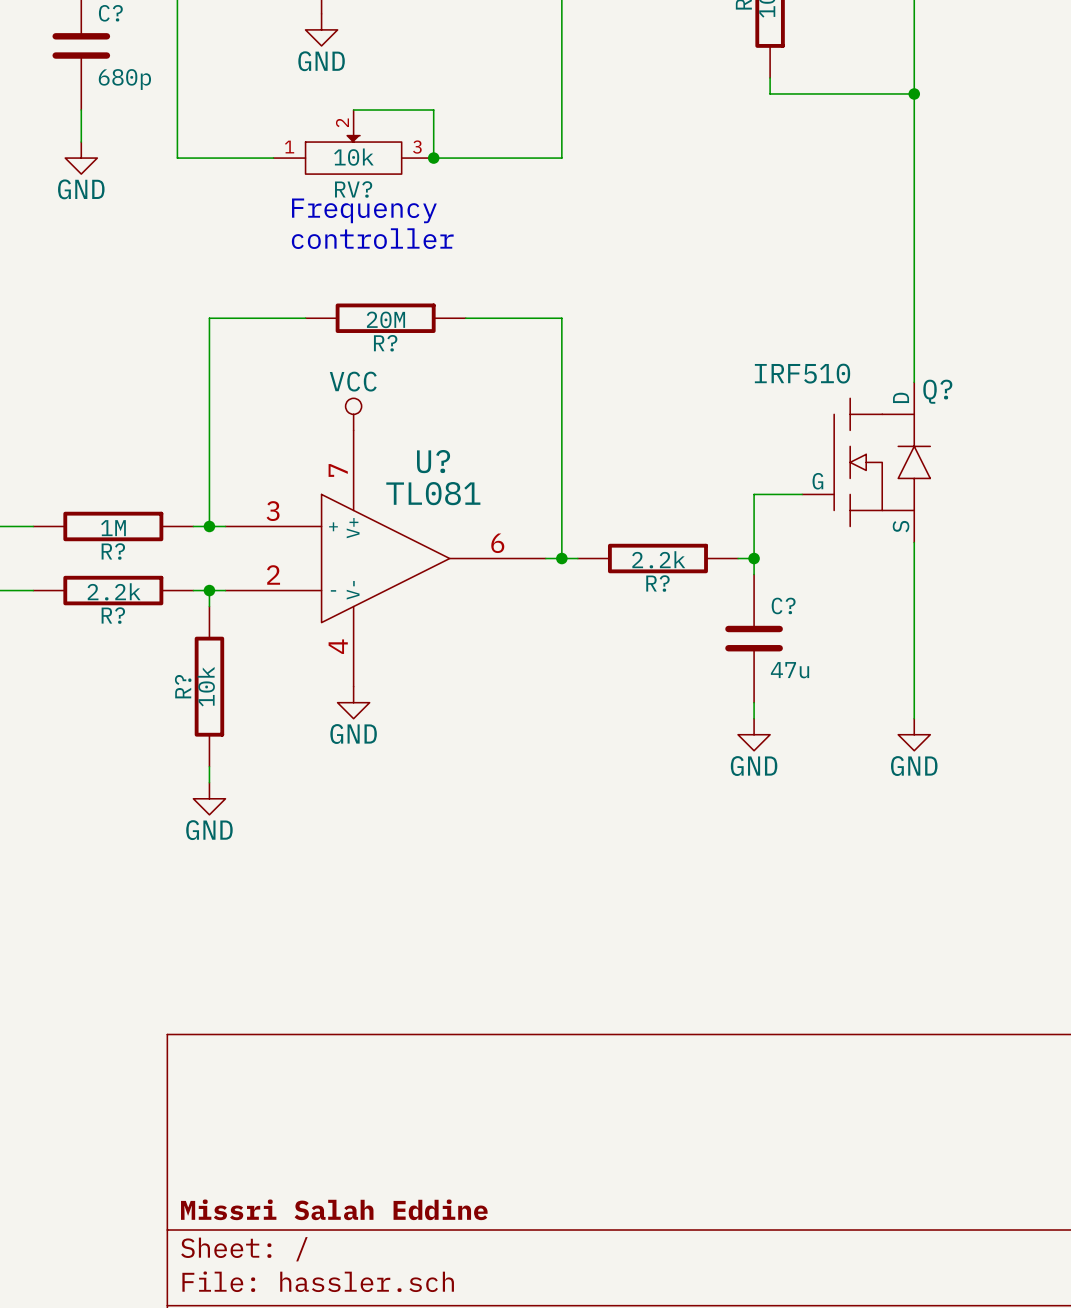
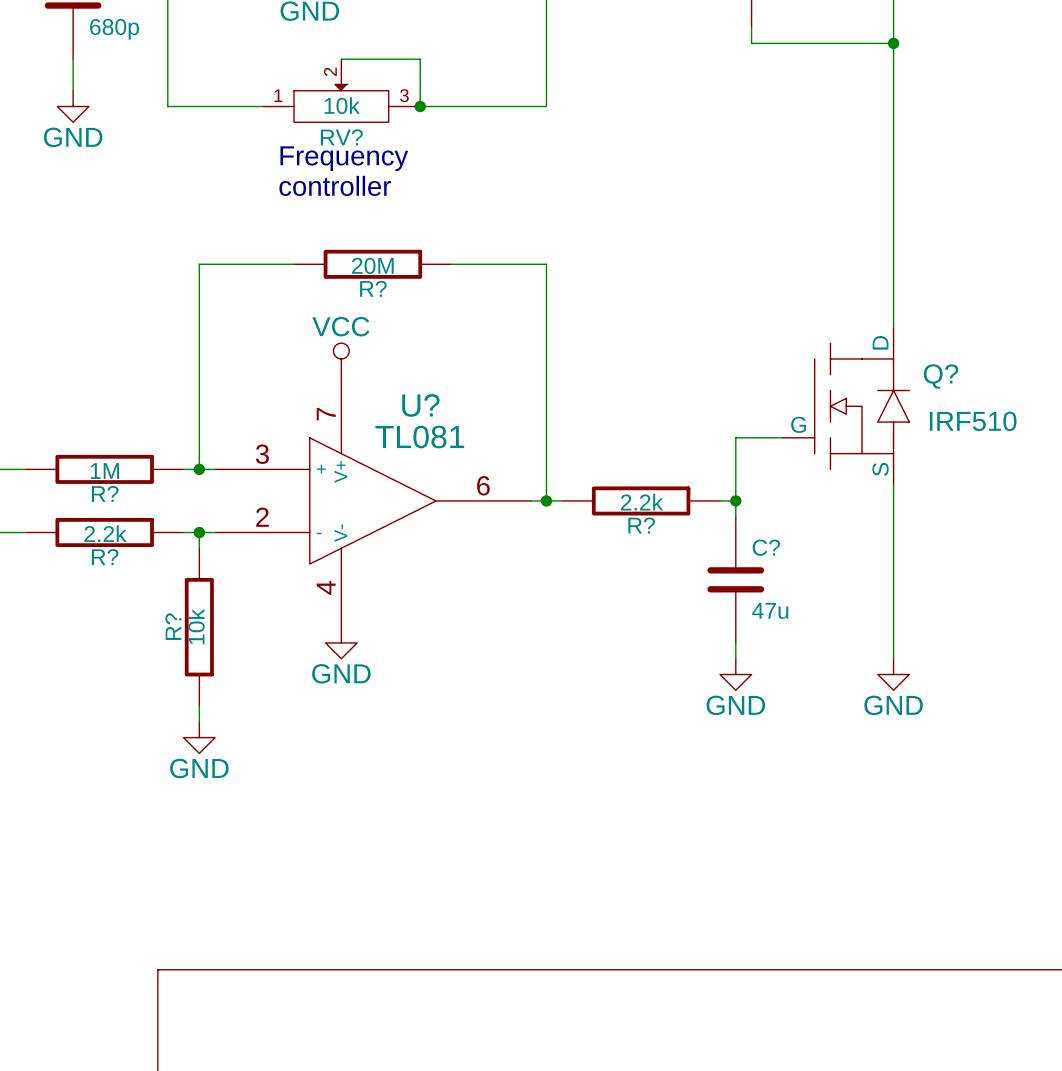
Q? value position: IRF510 (802, 373) -> IRF510 (973, 421)
Q? name position: Q? (937, 391) -> Q? (941, 376)

